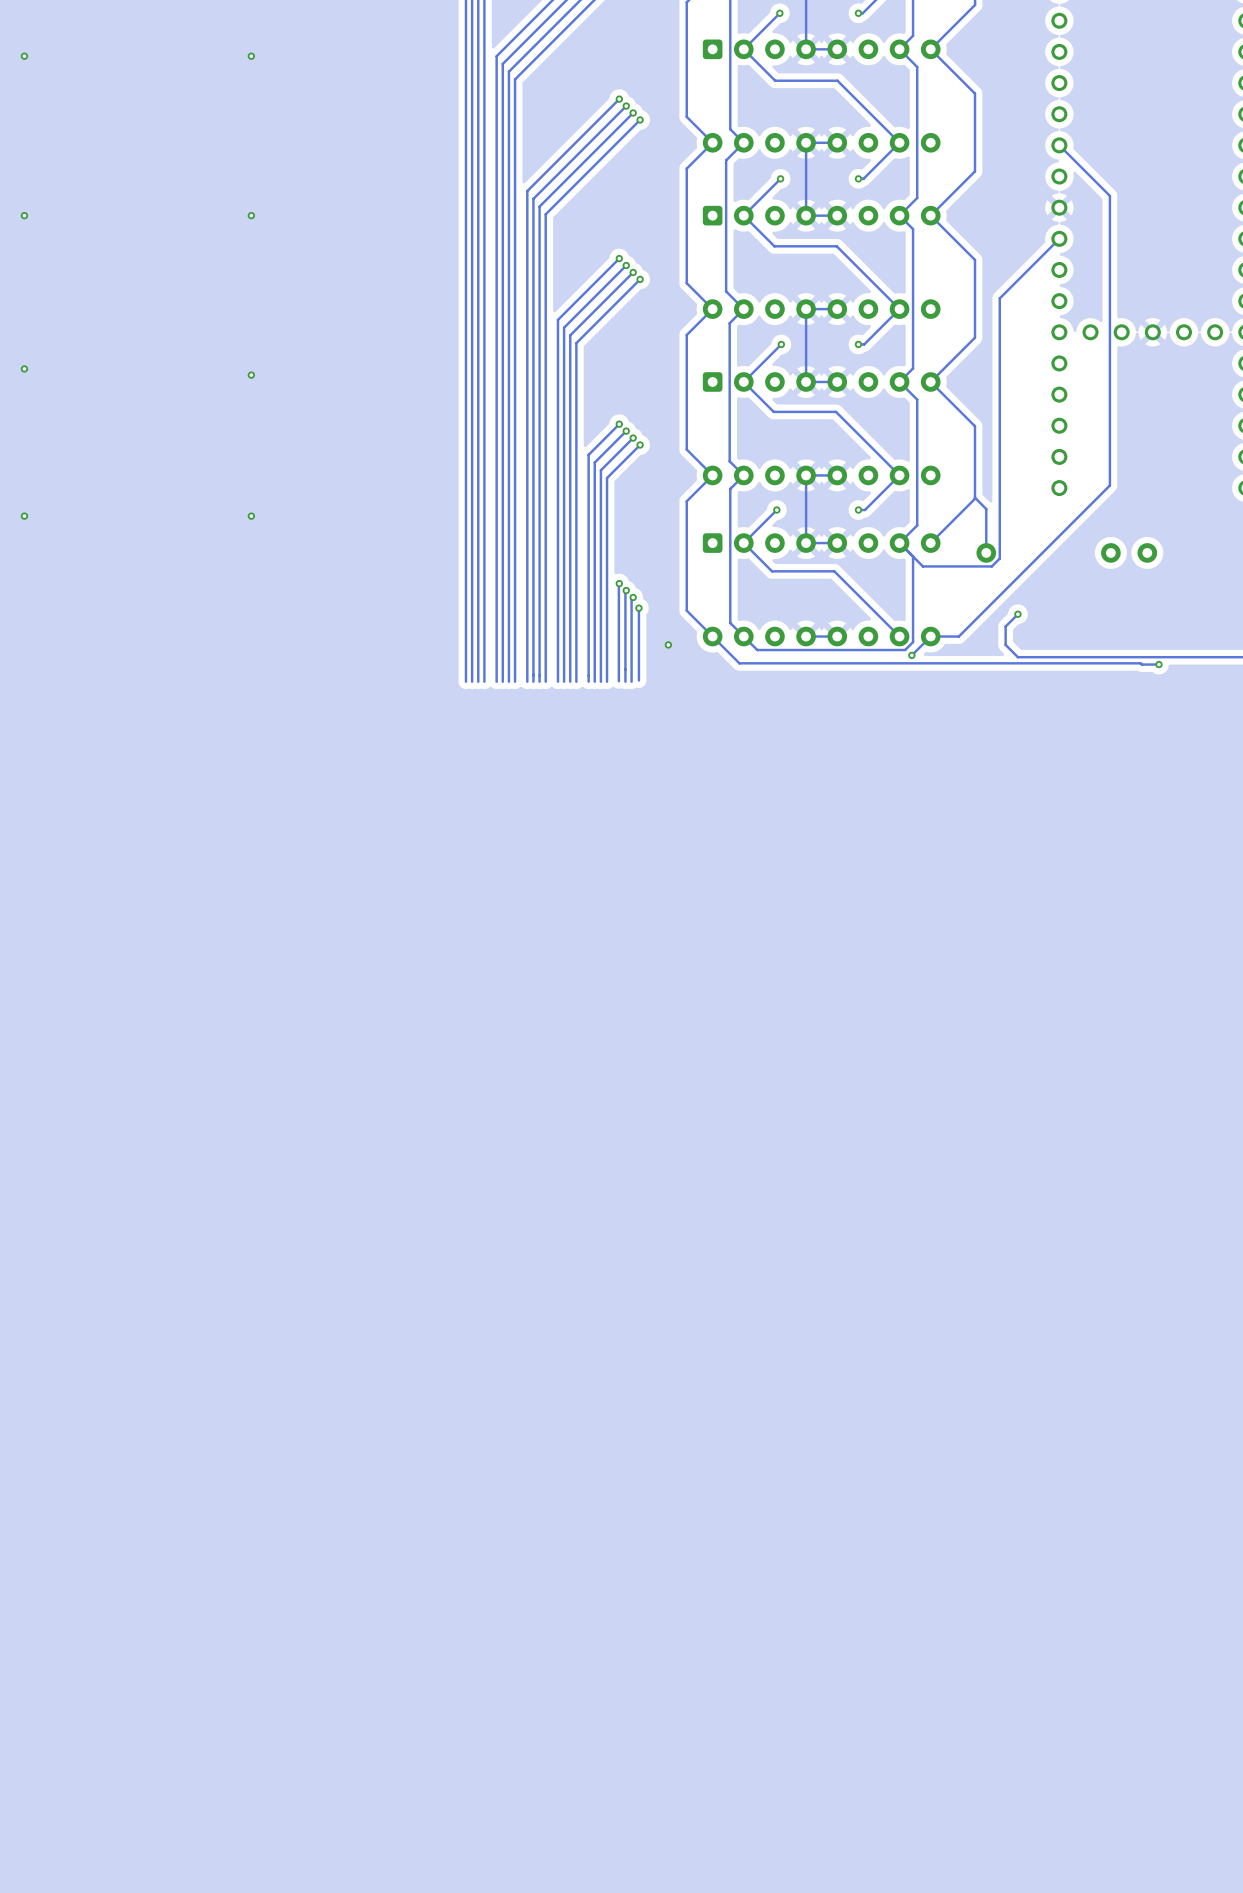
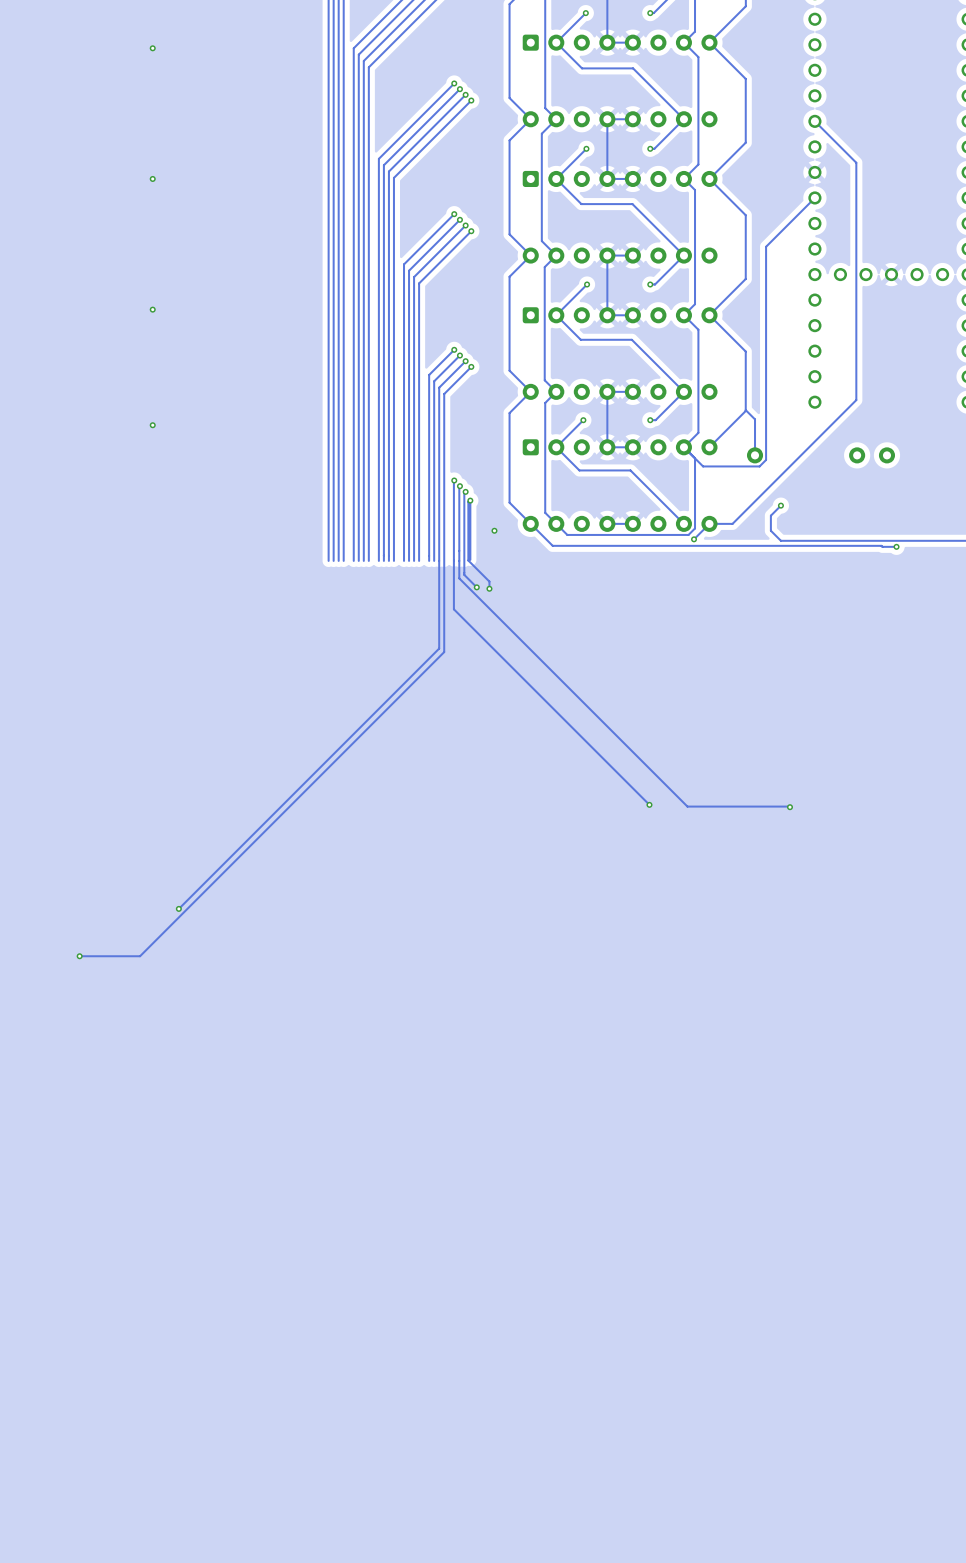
track: none -> (470, 499) (468, 501) (468, 560) (489, 581) (489, 588)
track: none -> (439, 560) (439, 648) (178, 908)
track: none -> (444, 560) (444, 652) (140, 956) (79, 956)
track: none -> (453, 560) (453, 609) (649, 804)
track: none -> (459, 560) (459, 578) (687, 806) (789, 807)
track: none -> (464, 560) (464, 574) (476, 587)
via: none -> (476, 587)
via: none -> (489, 588)
via: none -> (649, 804)
via: none -> (789, 807)
via: none -> (178, 908)
via: none -> (79, 956)

